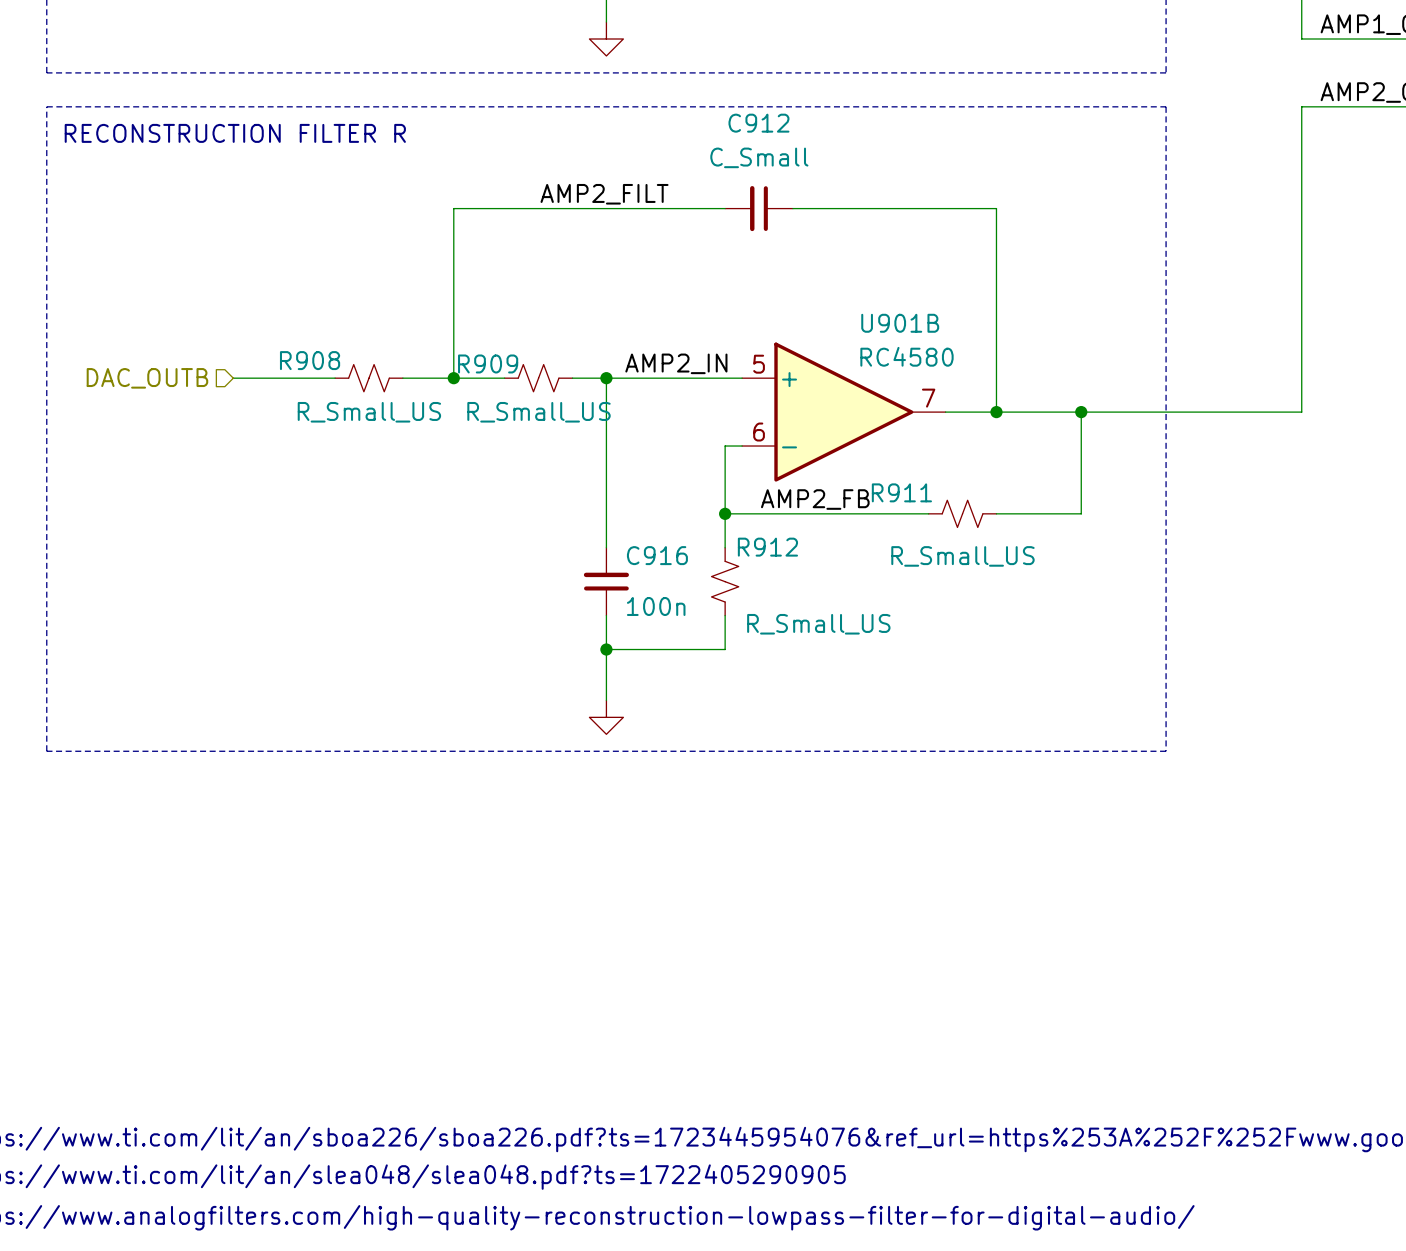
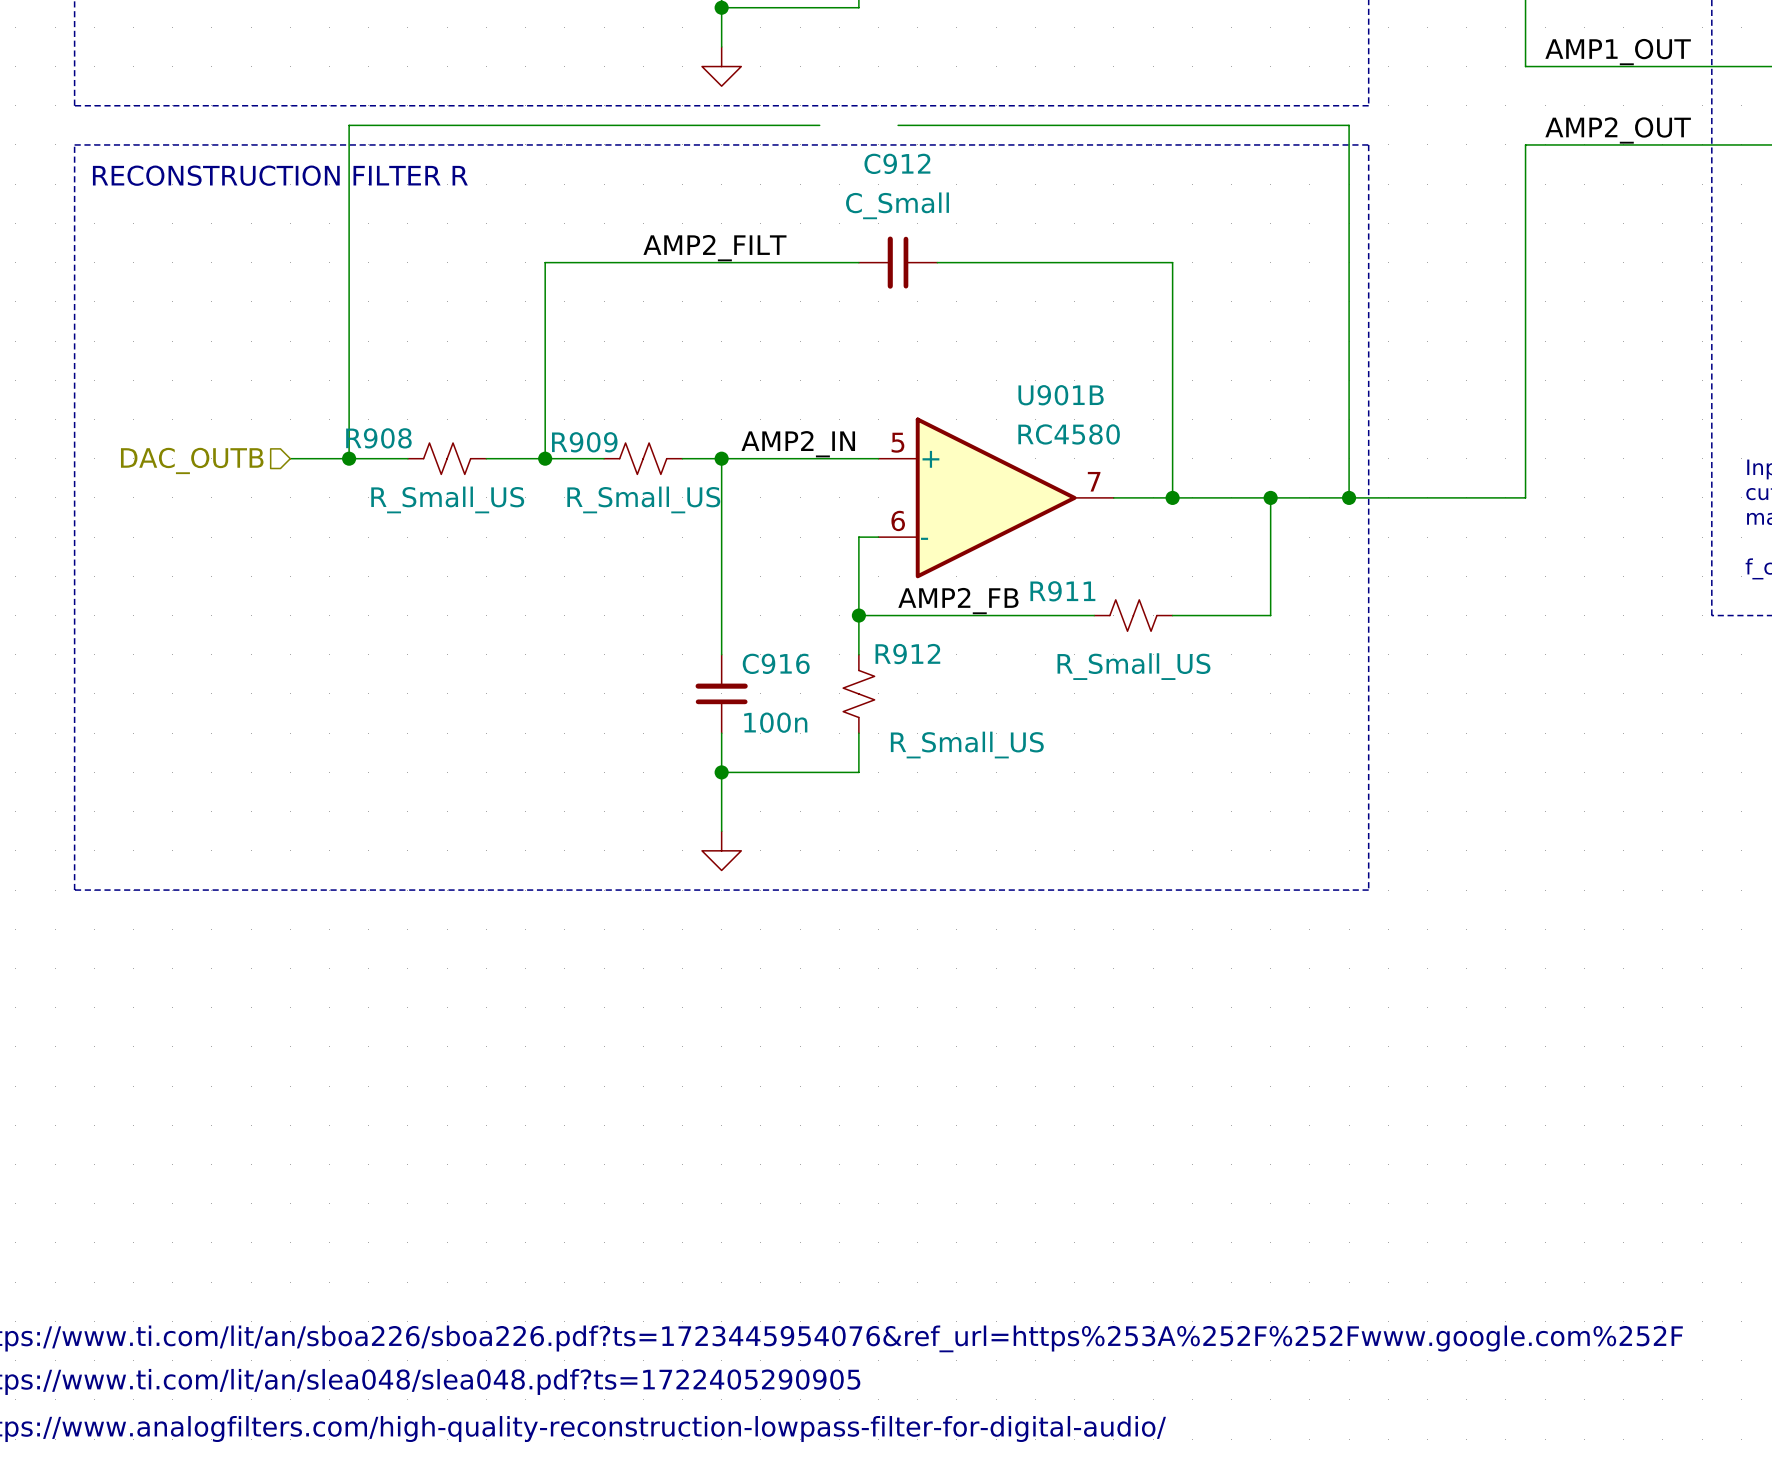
wire: none -> (819, 125) (349, 125) (349, 458)
wire: none -> (898, 125) (1349, 125) (1349, 497)
junction: none -> (349, 458)
junction: none -> (1349, 497)

